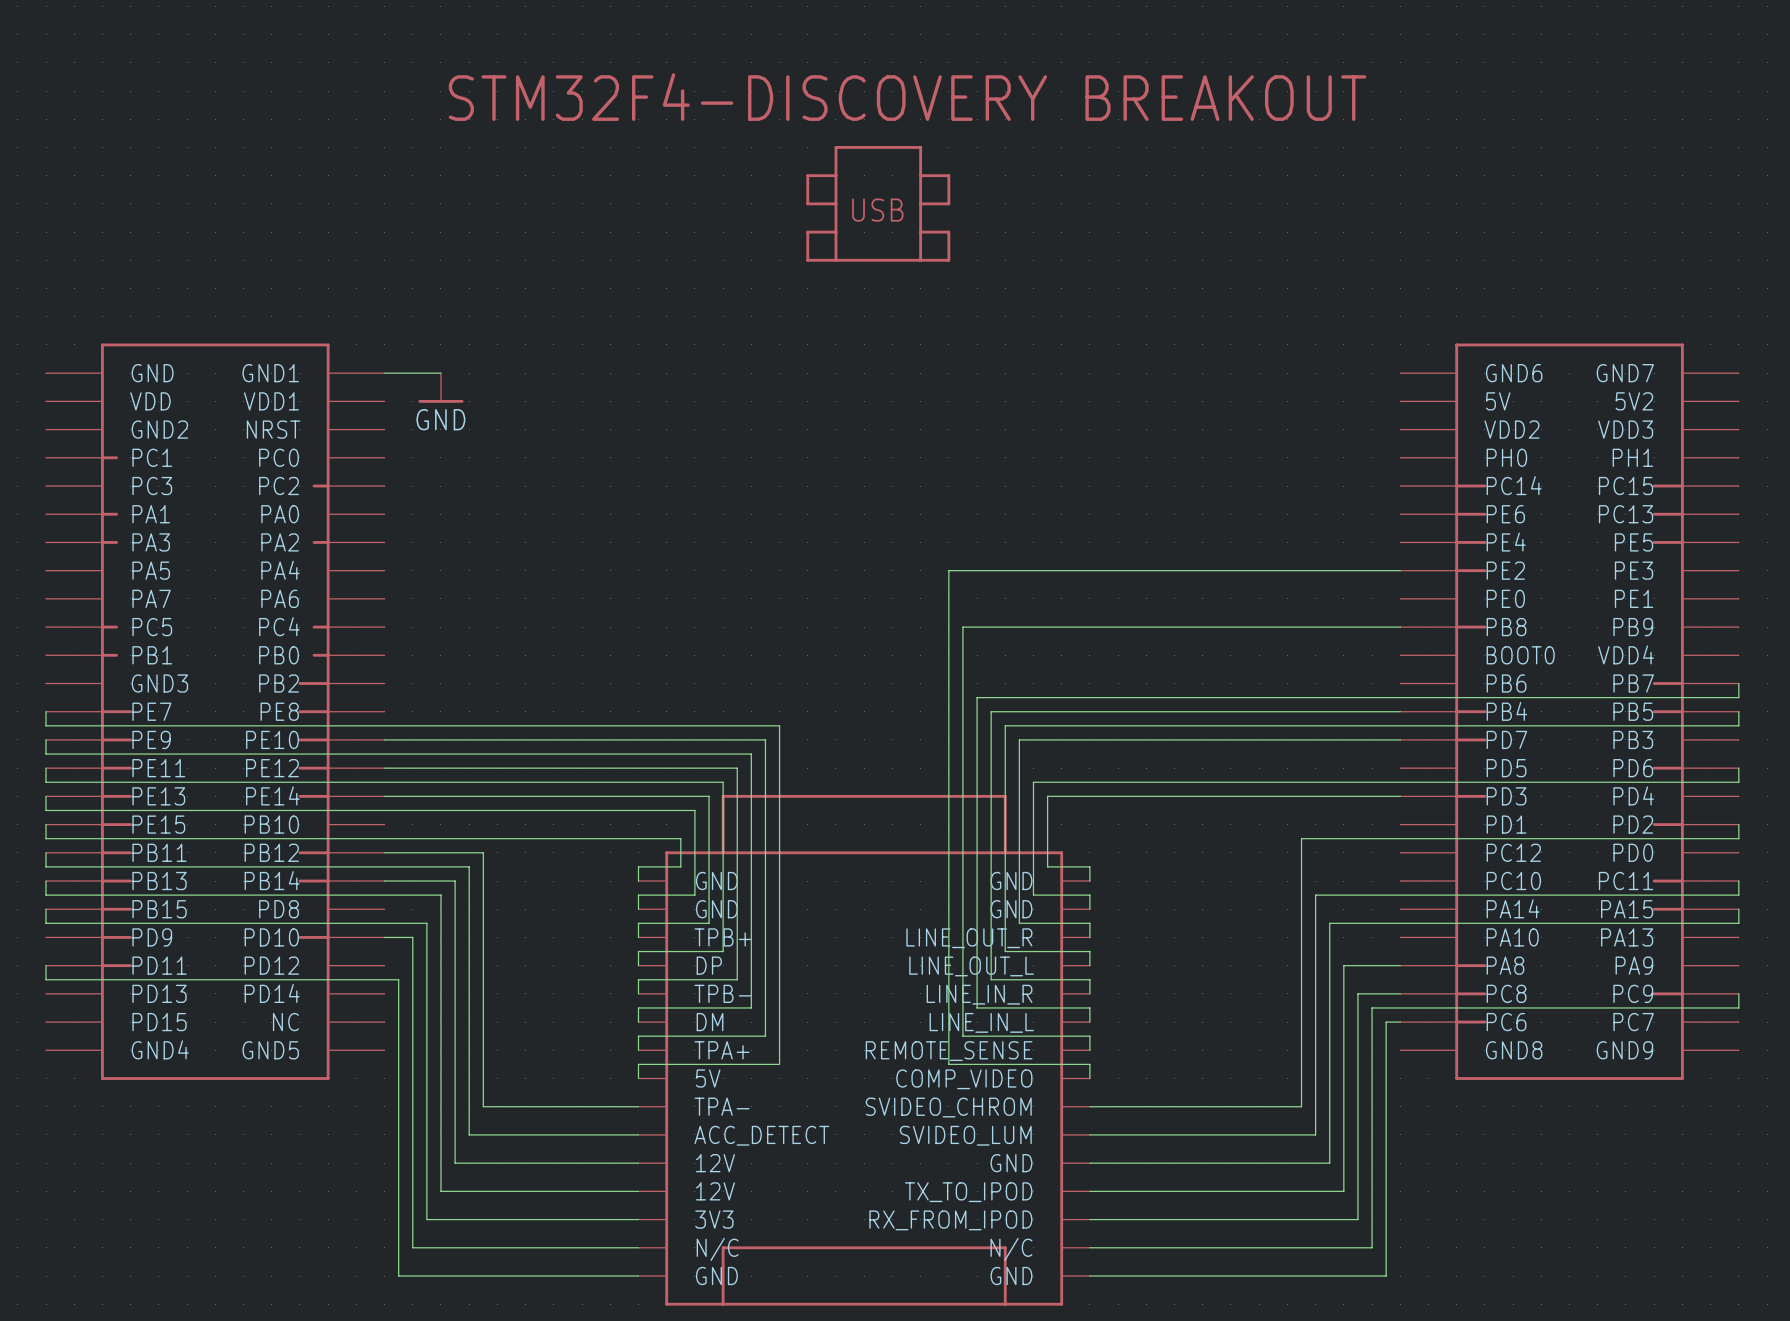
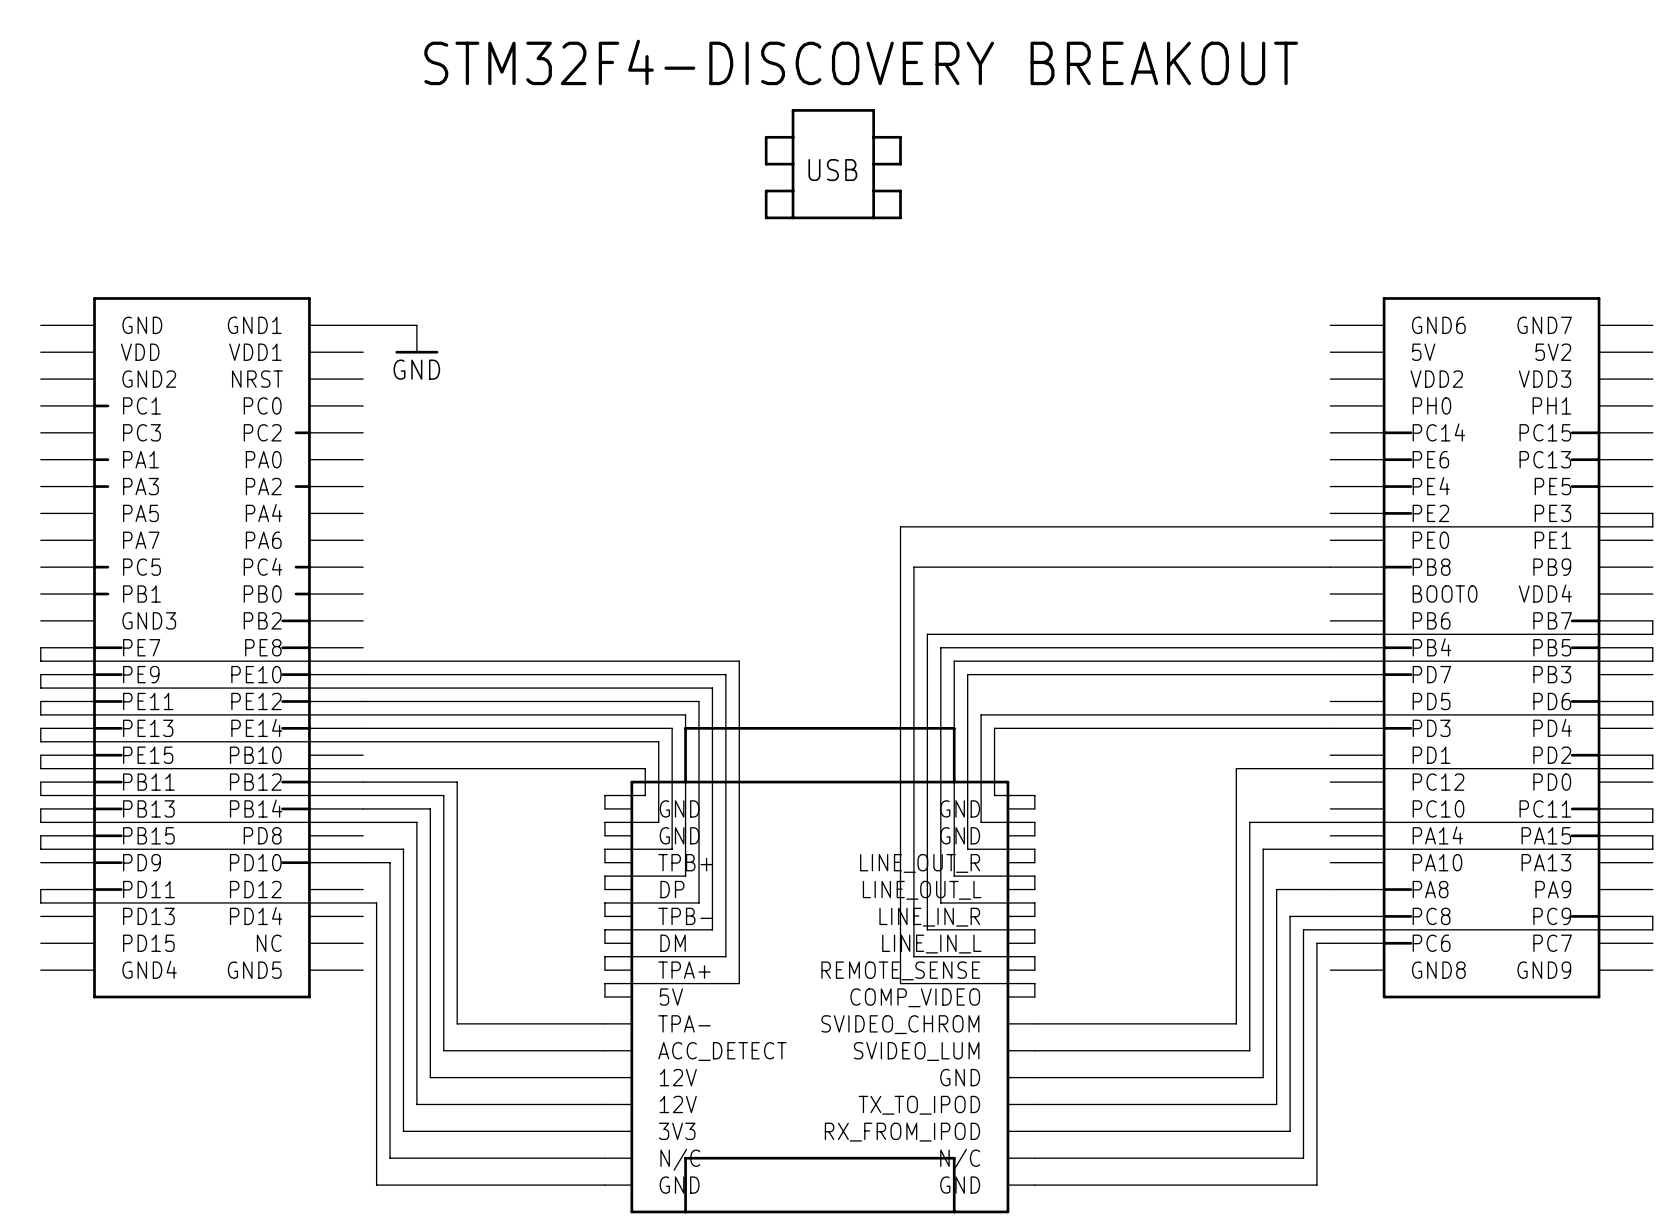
wire: (1400, 570) (948, 570) (948, 584) -> (1652, 513) (1652, 526) (900, 526)

